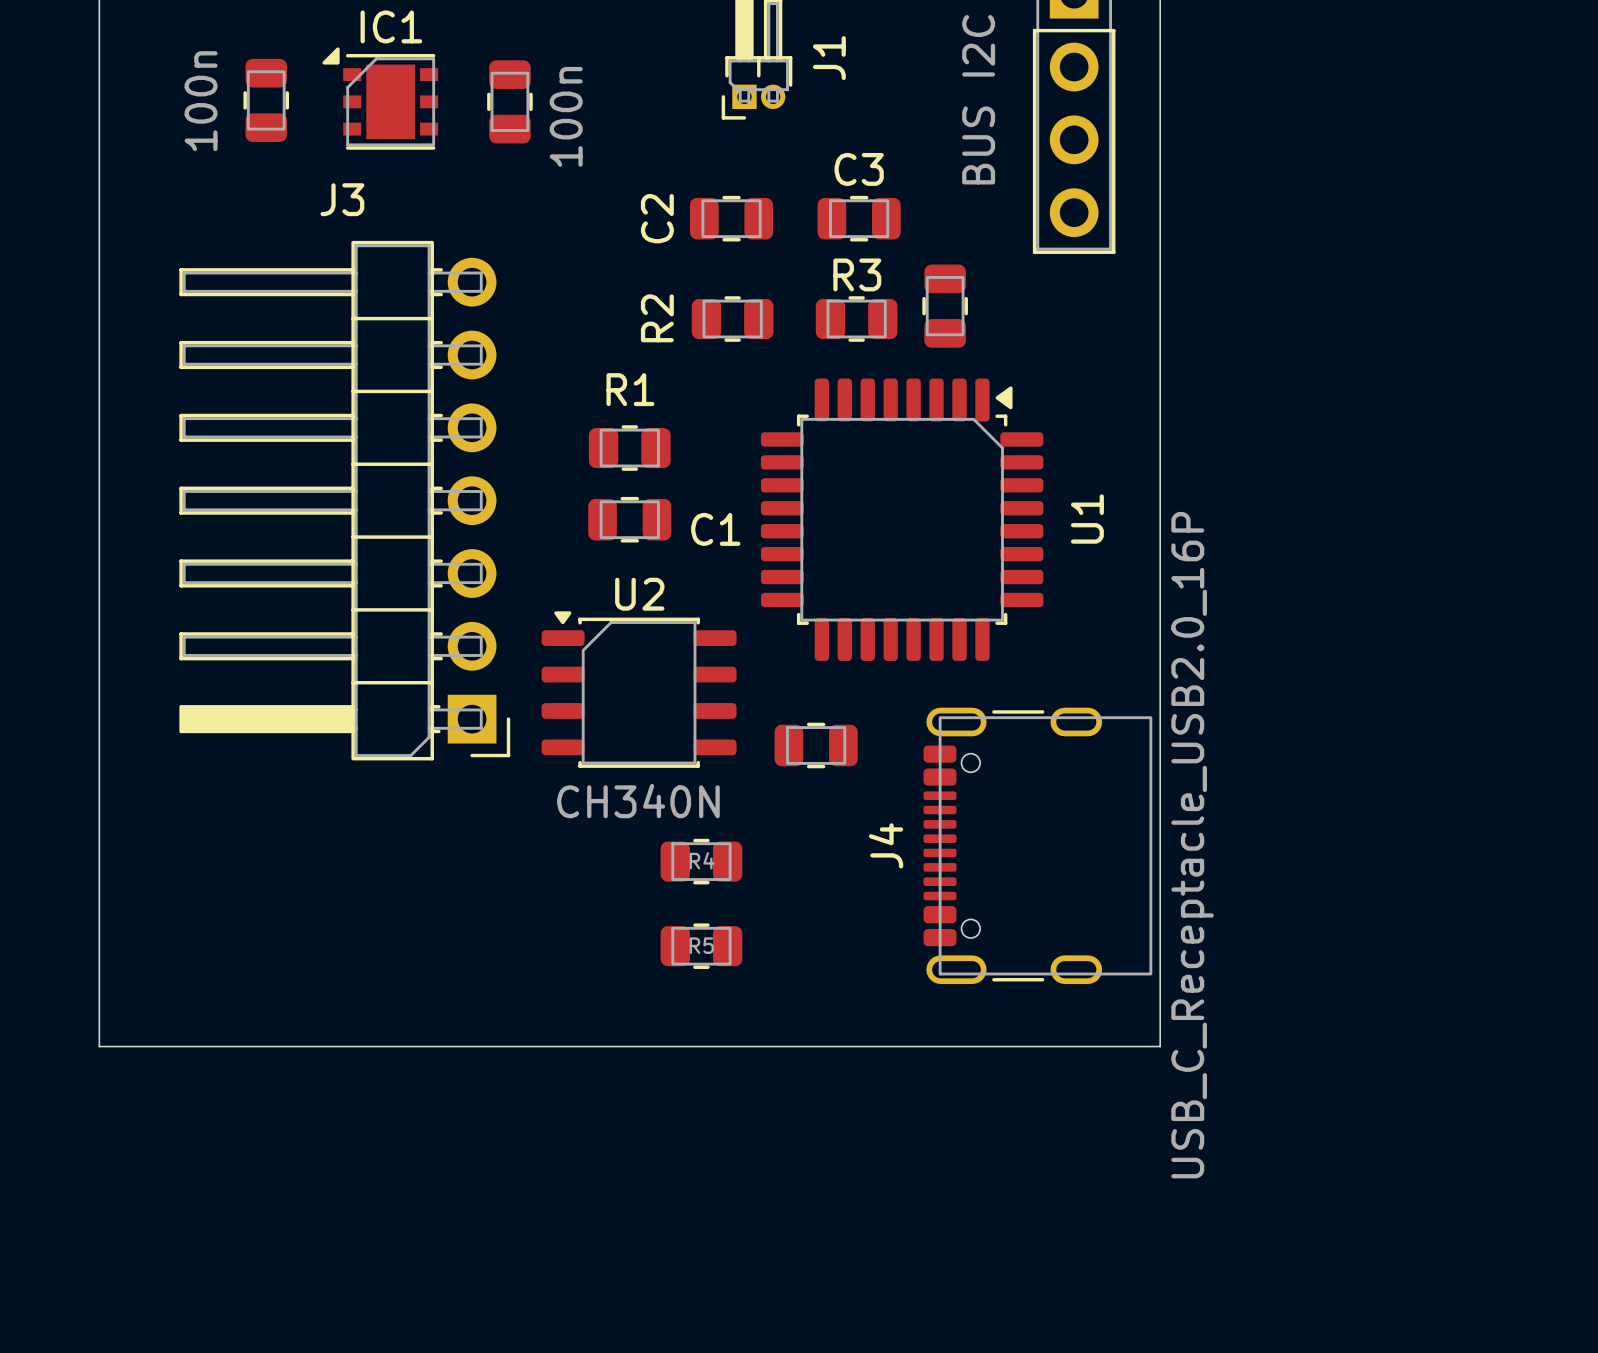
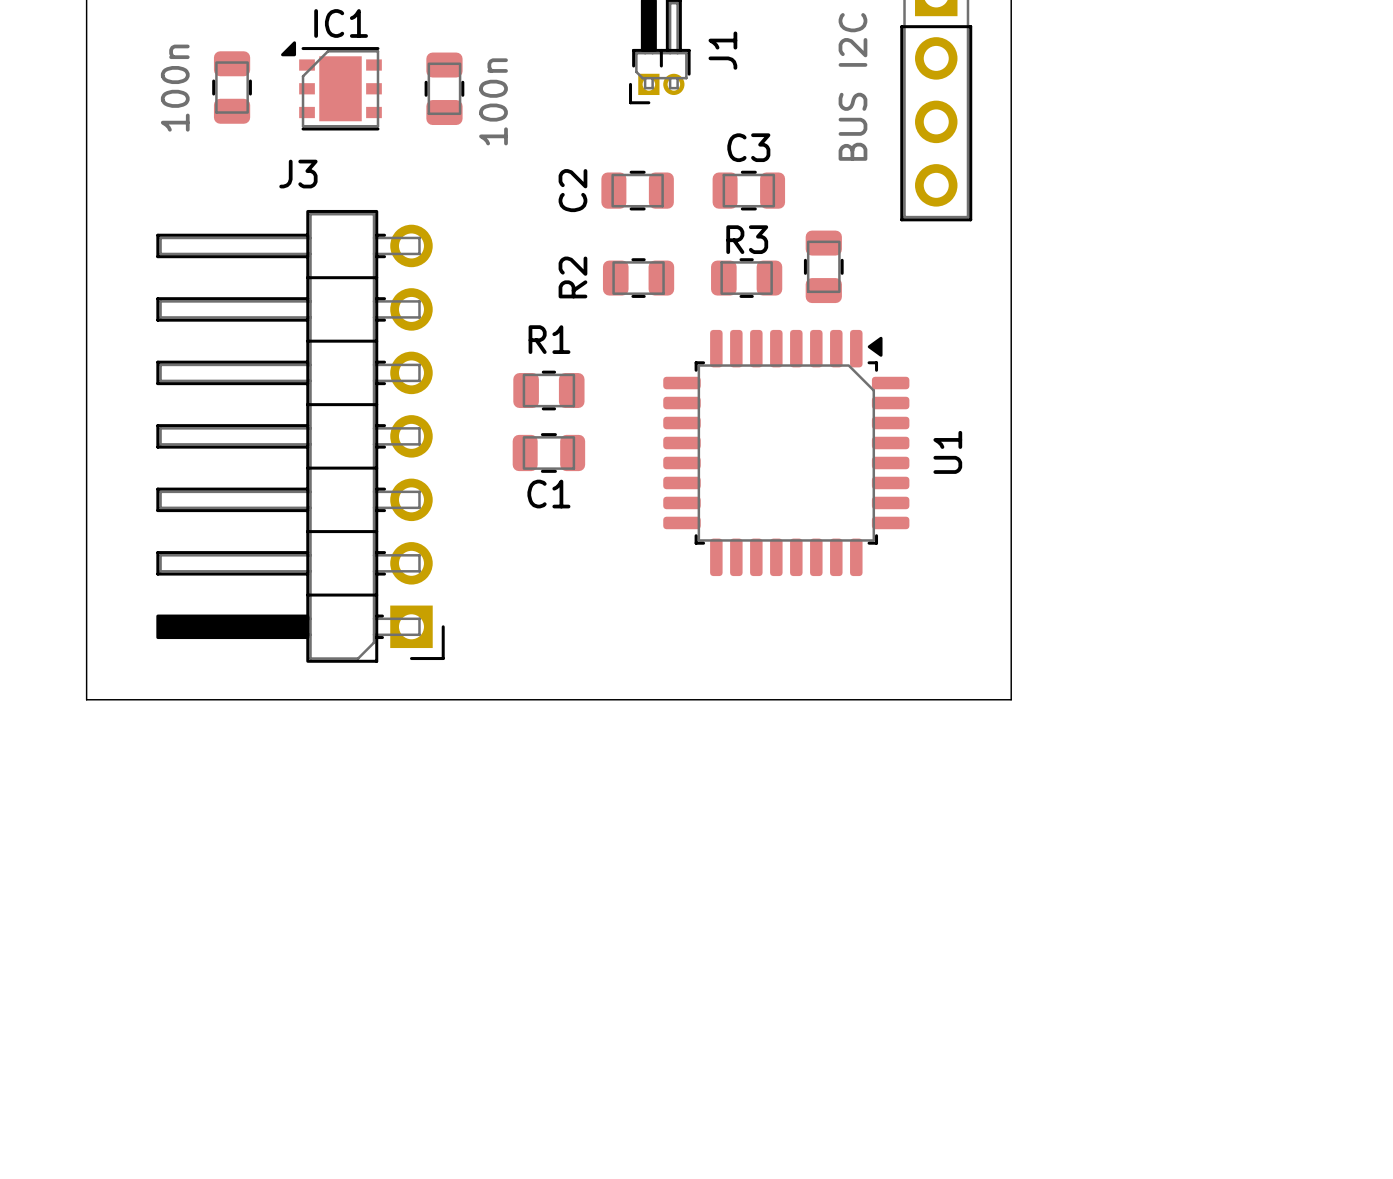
C1 name position: C1 (715, 529) -> C1 (548, 494)
U2: CH340N (639, 689) -> none
part: (816, 745) -> none
board edge: (99, 802) (99, 1046) (1160, 1046) (1160, 802) -> (86, 699) (1011, 699)
J4: USB_C_Receptacle_USB2.0_16P (1037, 845) -> none
R4: (701, 861) -> none
R5: (701, 946) -> none

